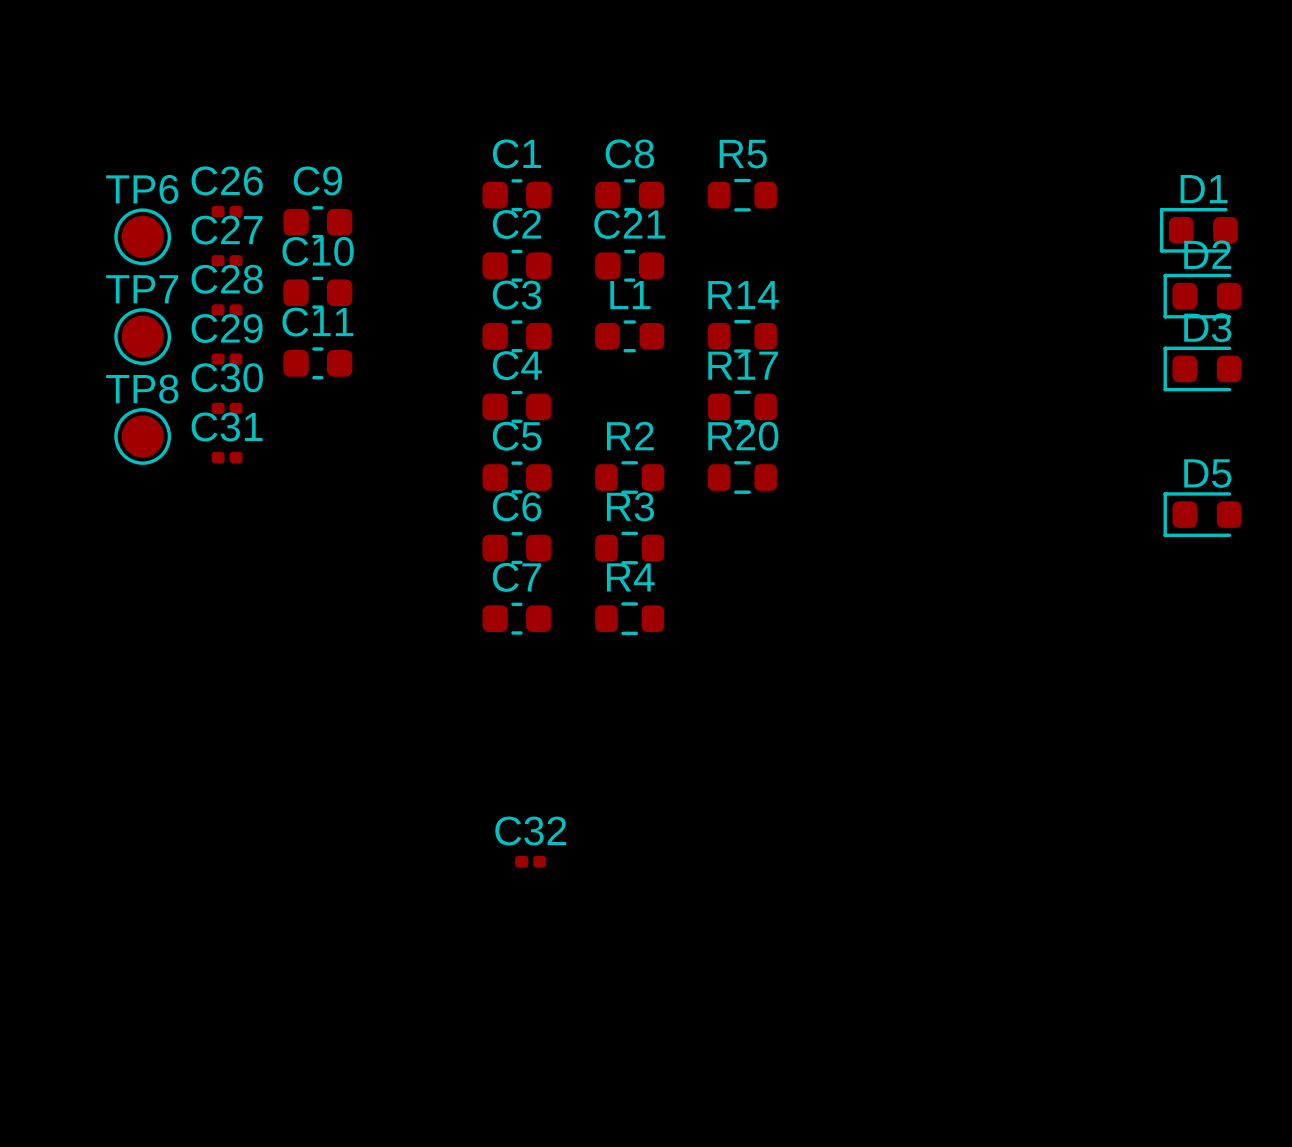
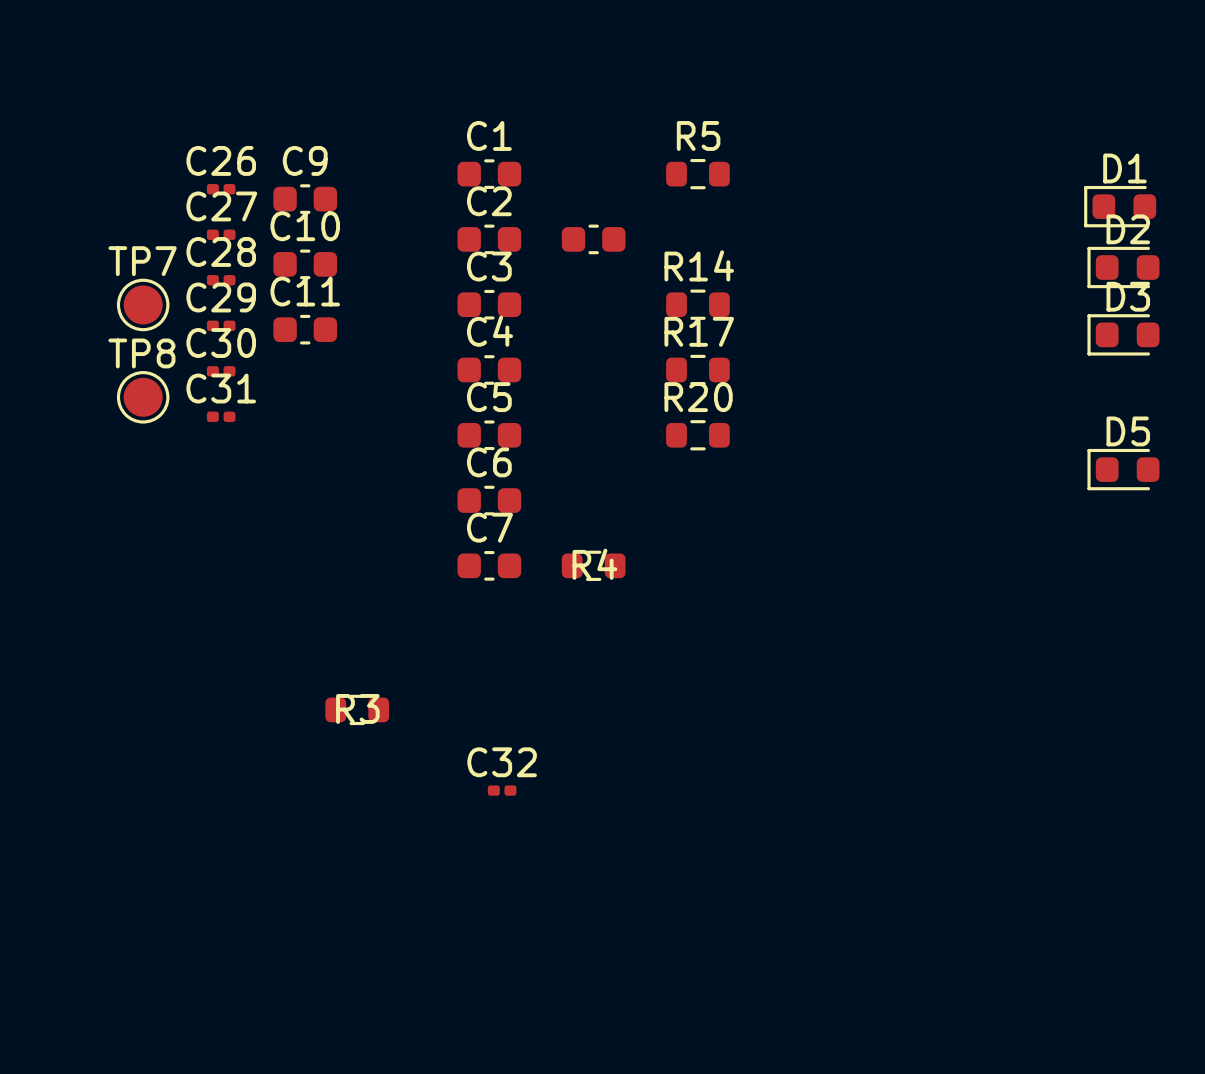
C8: (629, 195) -> none
C21 name: C21 (629, 224) -> none
TP6: (142, 236) -> none
L1: (629, 336) -> none
R2: (629, 477) -> none
R3 name position: R3 (630, 506) -> R3 (357, 708)
R3 position: (629, 548) -> (357, 709)
R4 name position: R4 (630, 577) -> R4 (594, 564)

